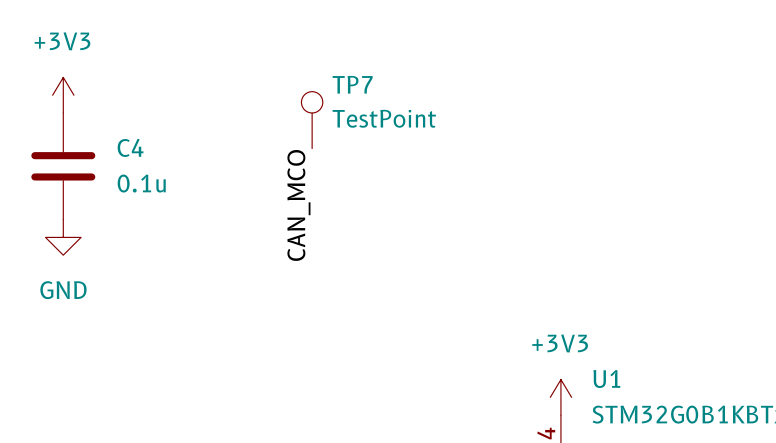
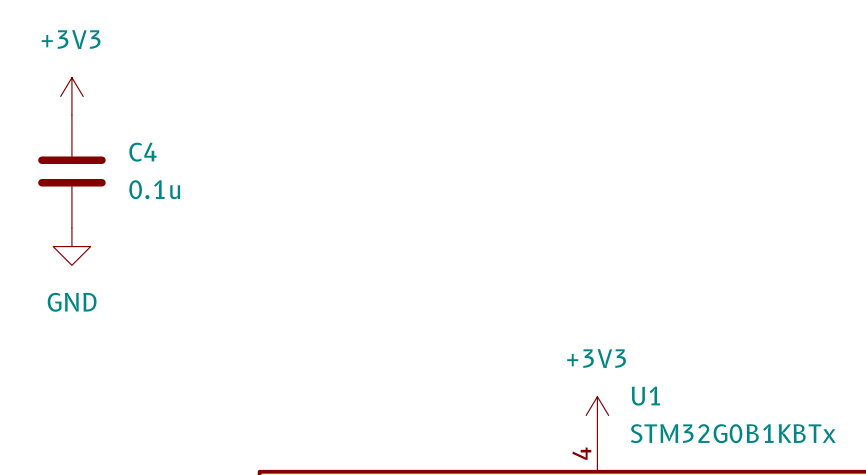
TP7: TestPoint (312, 120) -> none
label: CAN_MCO (298, 205) -> none

